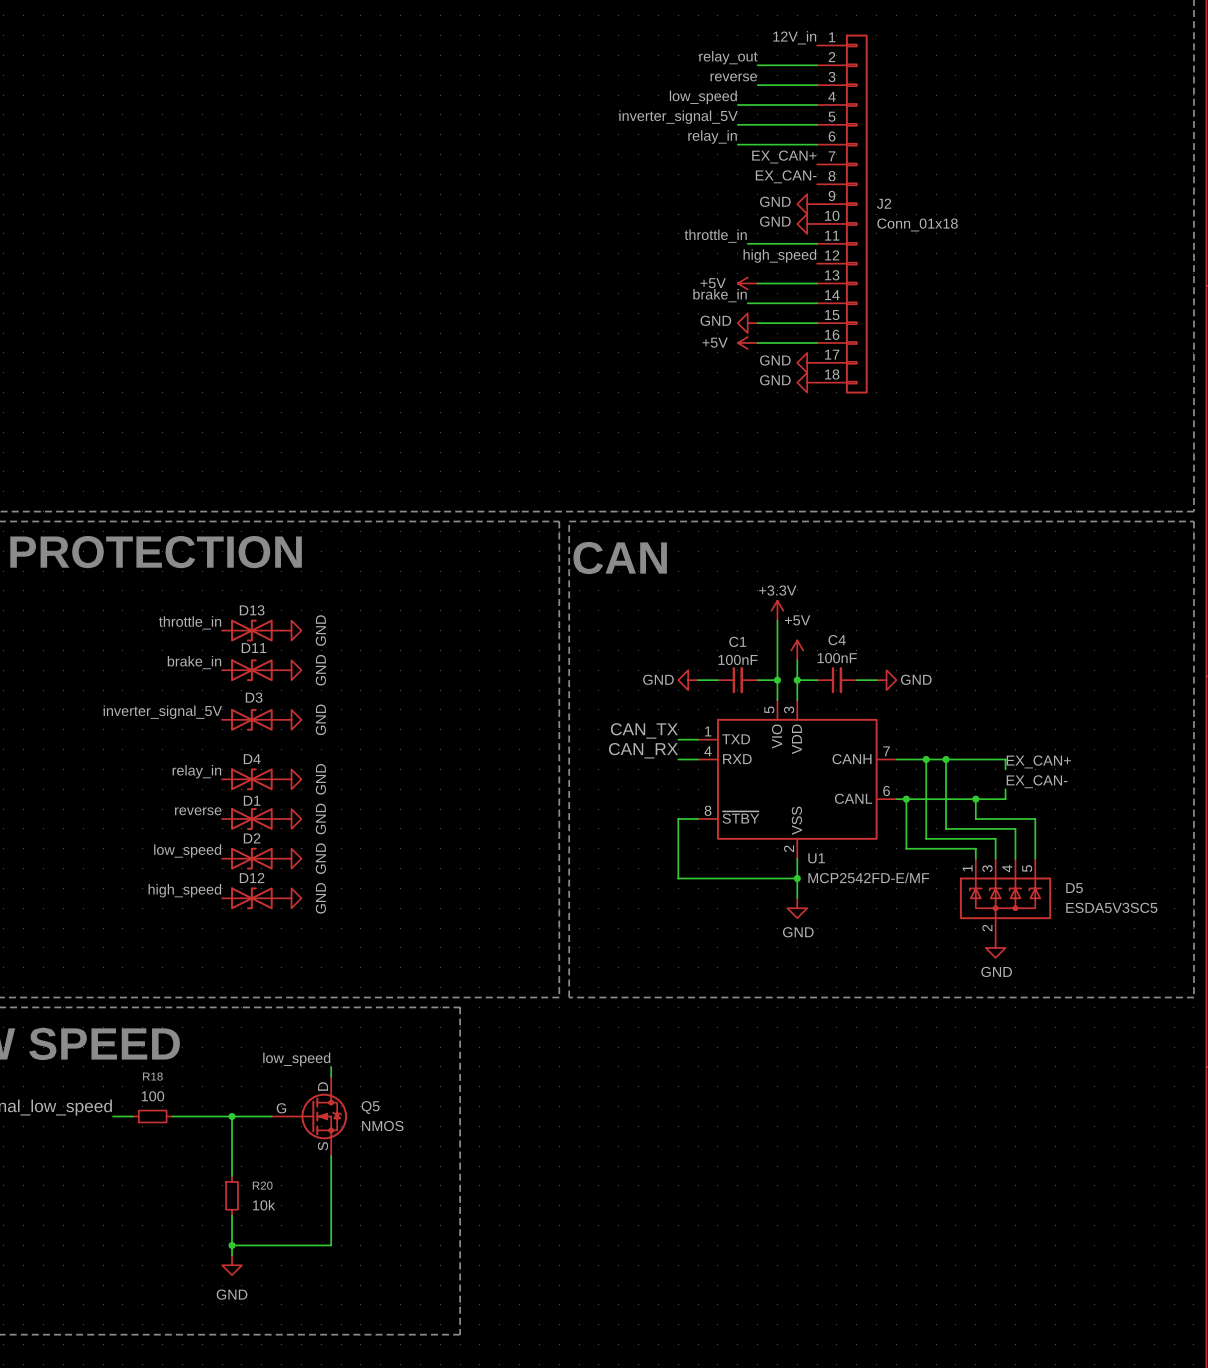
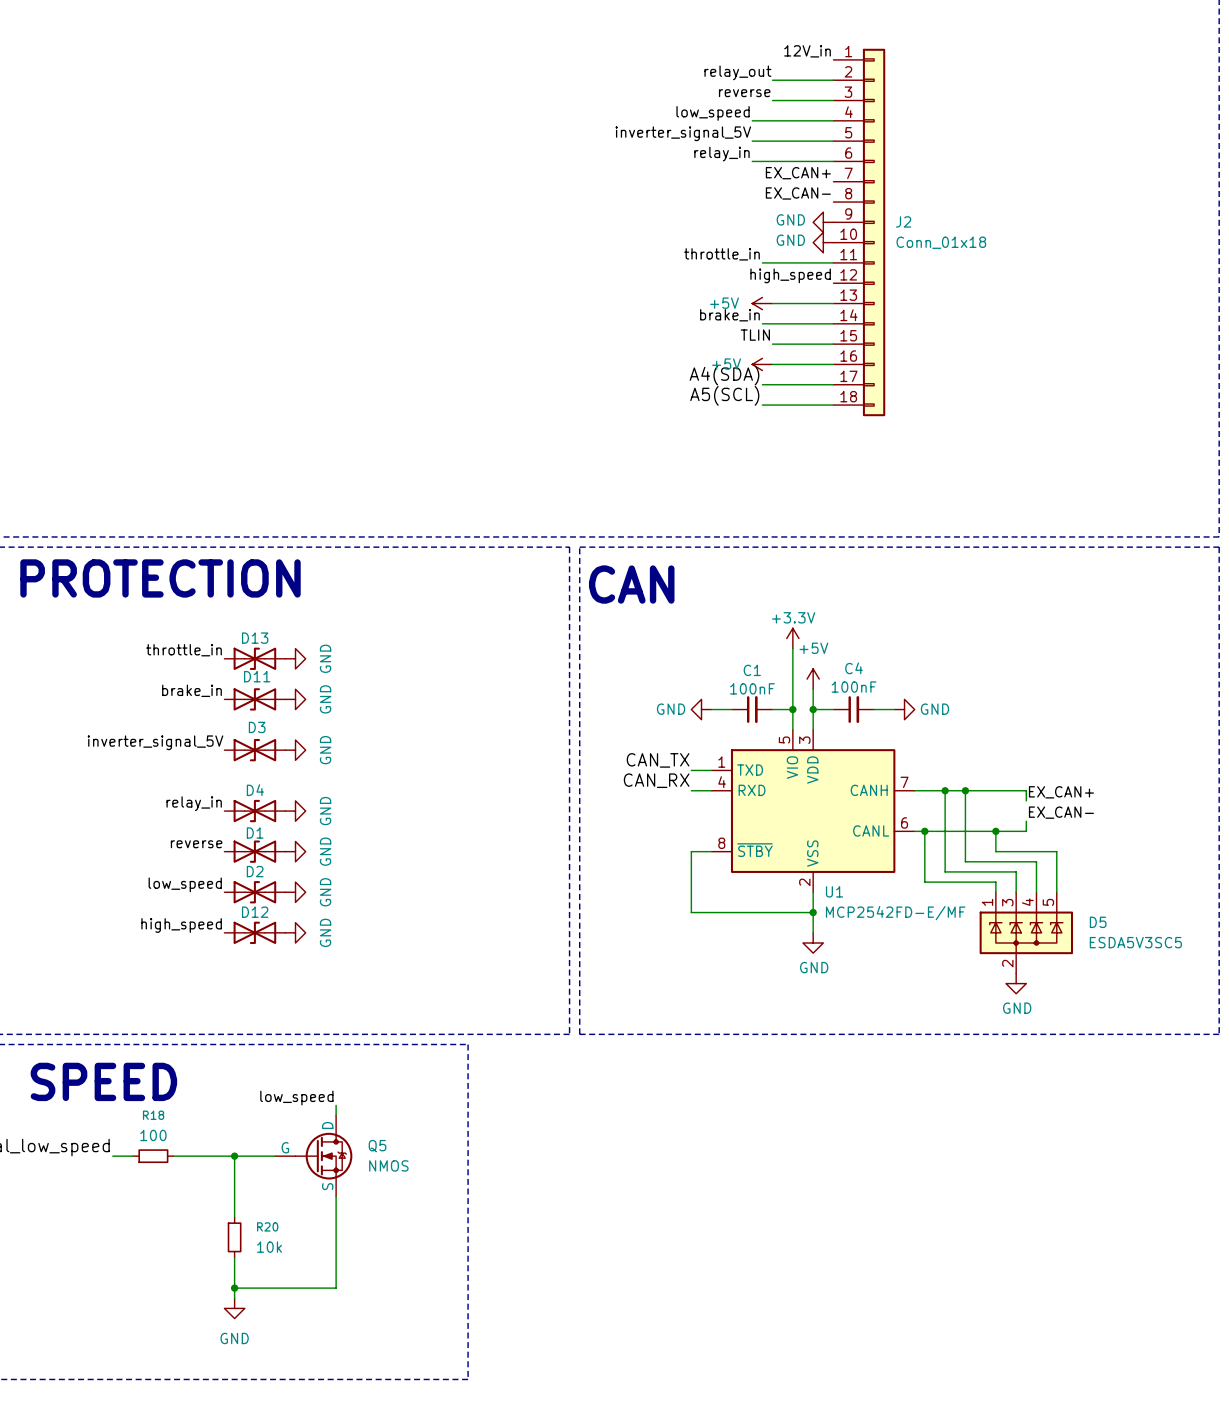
label: none -> TLIN (755, 335)
power symbol: GND (747, 323) -> none
label: none -> A4(SDA) (724, 375)
wire: none -> (762, 384) (833, 384)
power symbol: GND (807, 362) -> none
label: none -> A5(SCL) (724, 395)
wire: none -> (762, 405) (833, 405)
power symbol: GND (807, 382) -> none

